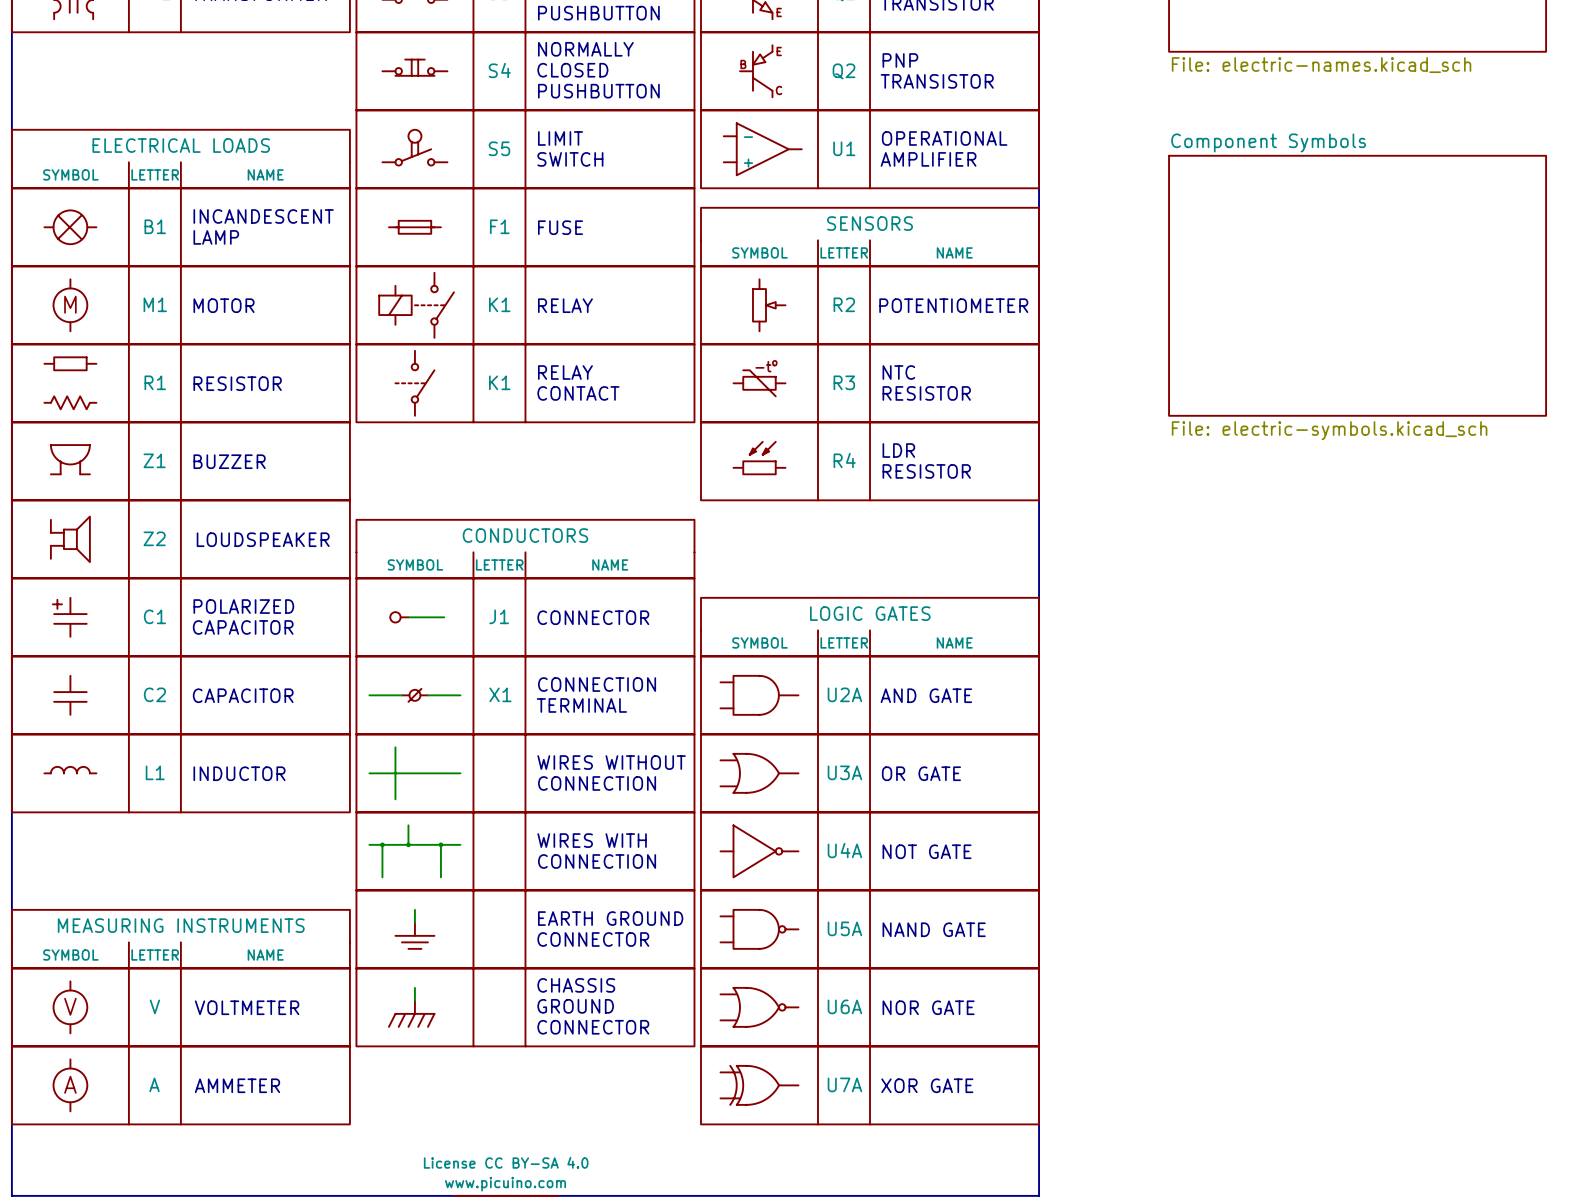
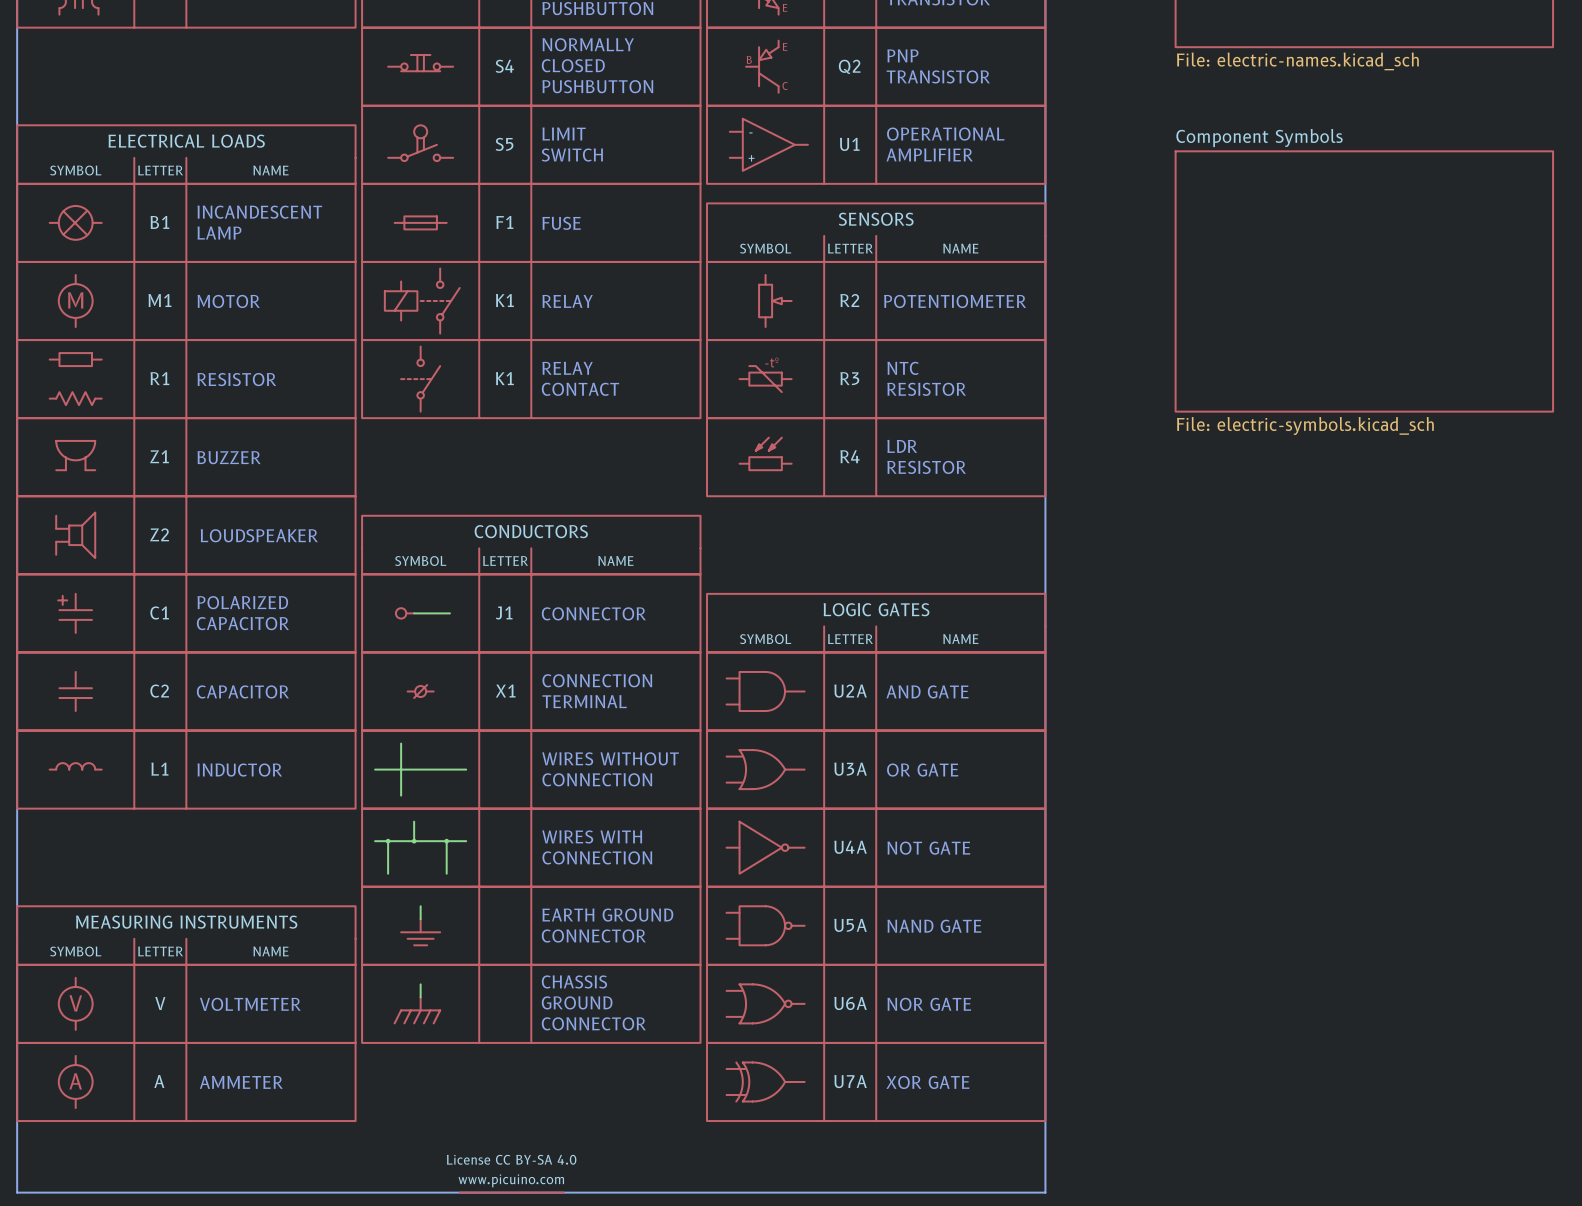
wire: (369, 695) (401, 695) -> none
wire: (427, 695) (460, 695) -> none

